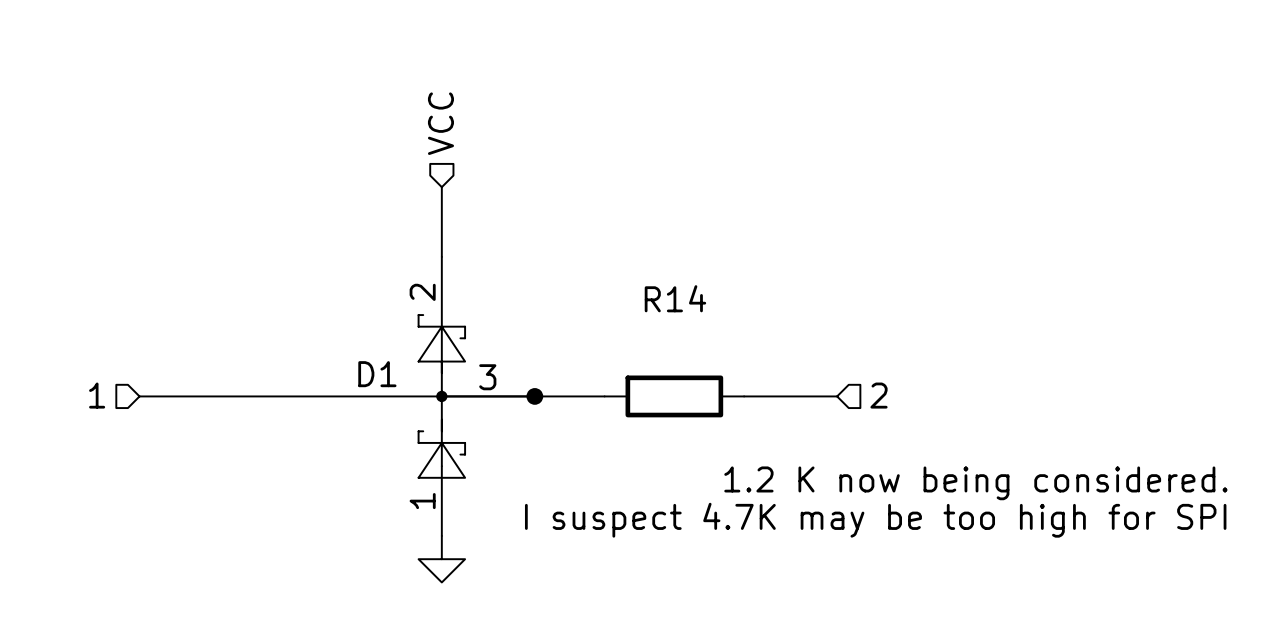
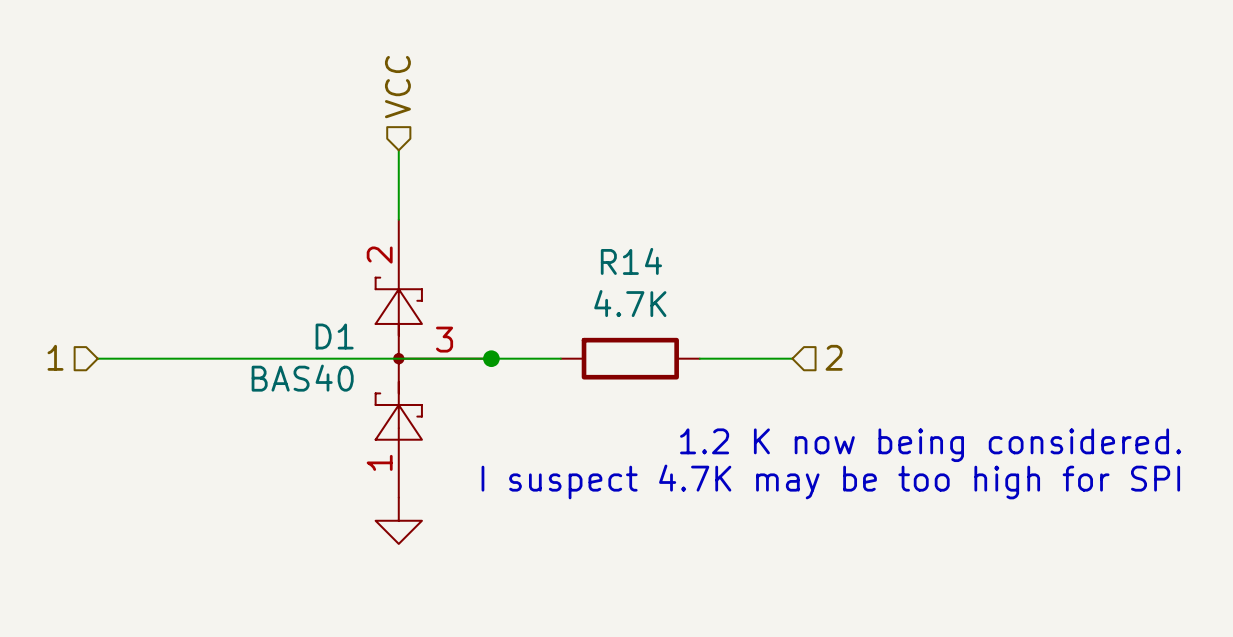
R14 value: none -> 4.7K (630, 303)
D1 value: none -> BAS40 (302, 378)

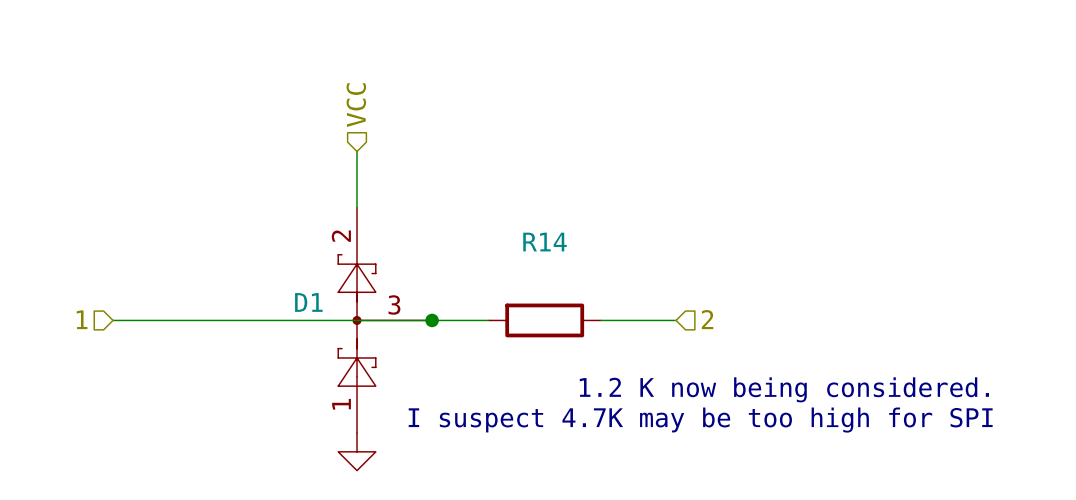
R14 value: 4.7K (630, 303) -> none
D1 value: BAS40 (302, 378) -> none

